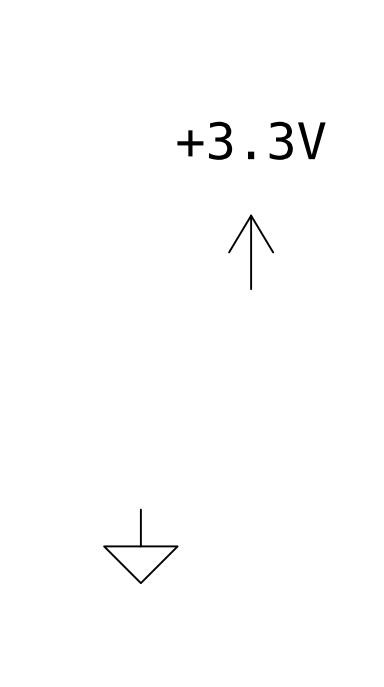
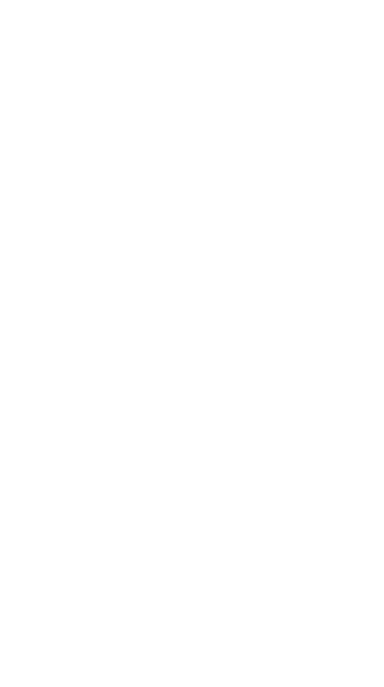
power symbol: +3.3V (251, 252) -> none
power symbol: (140, 546) -> none

